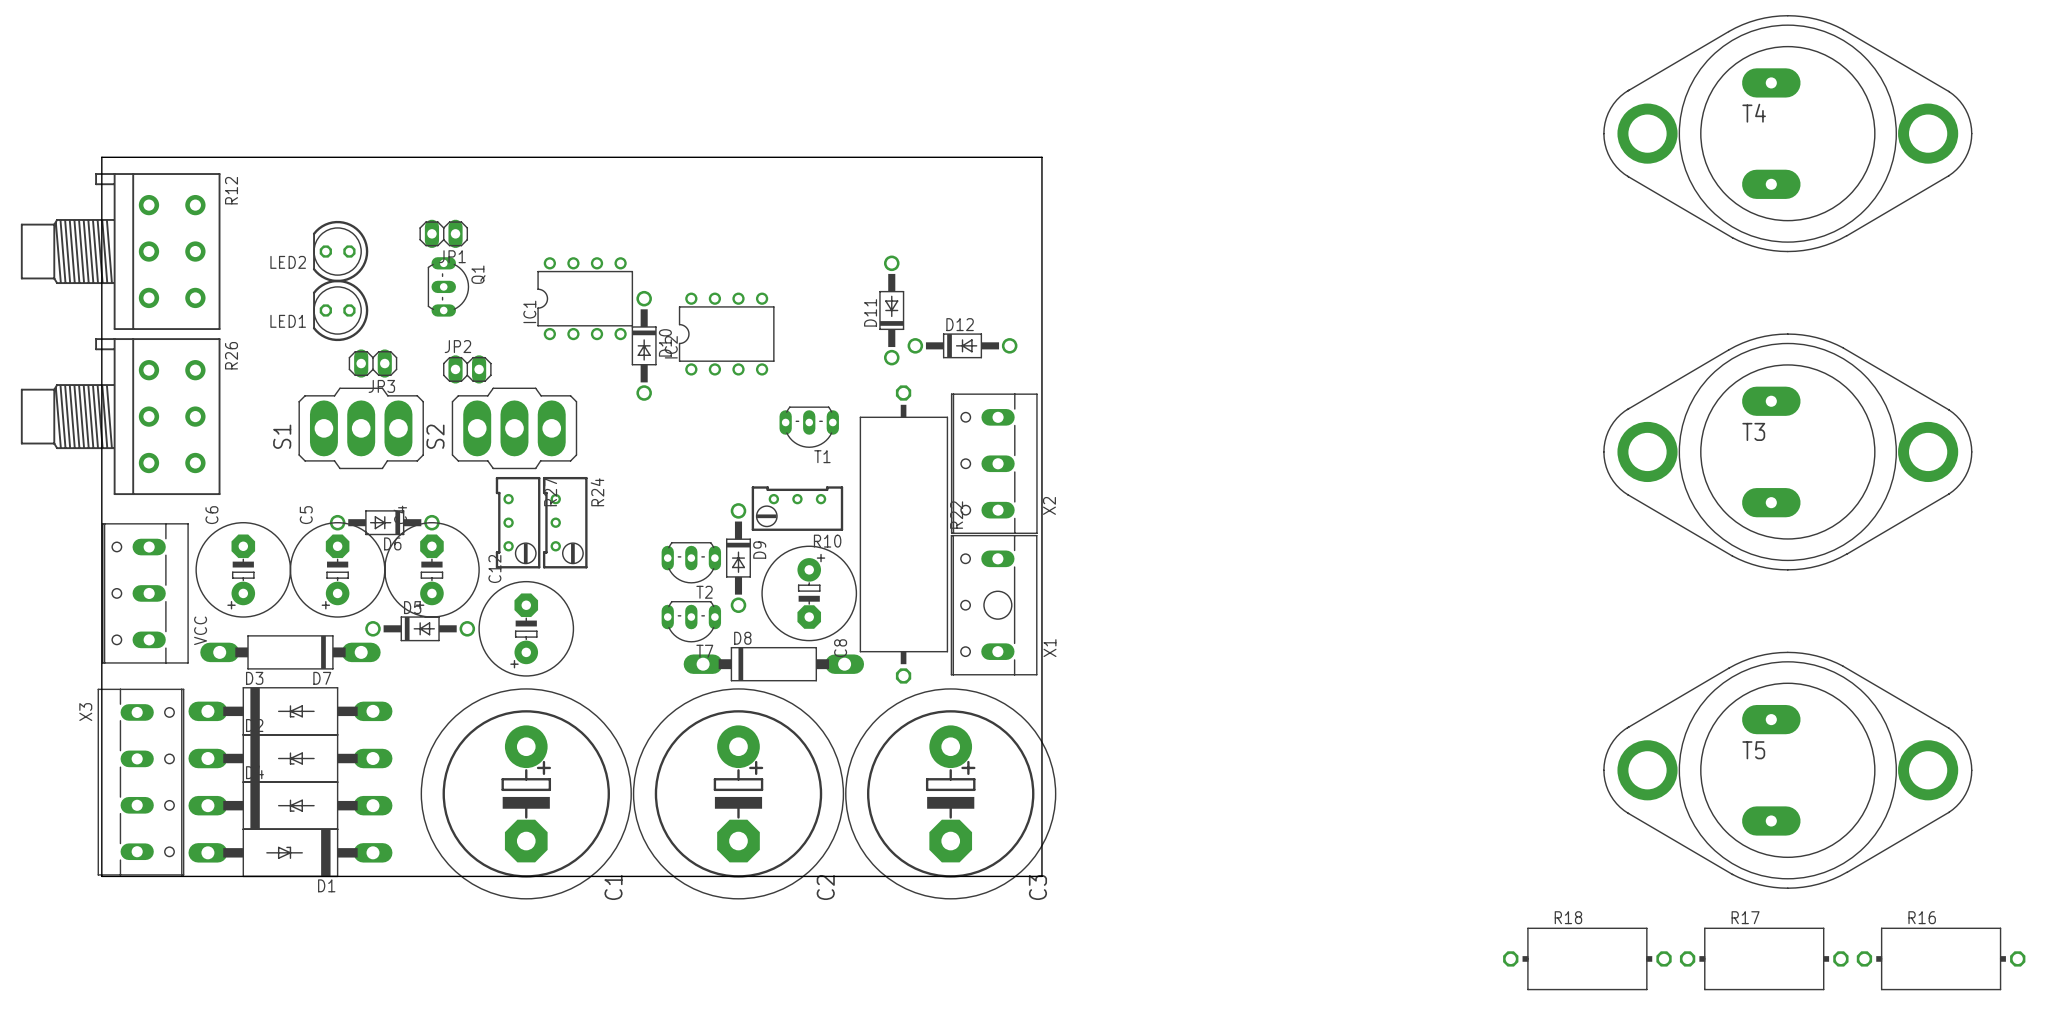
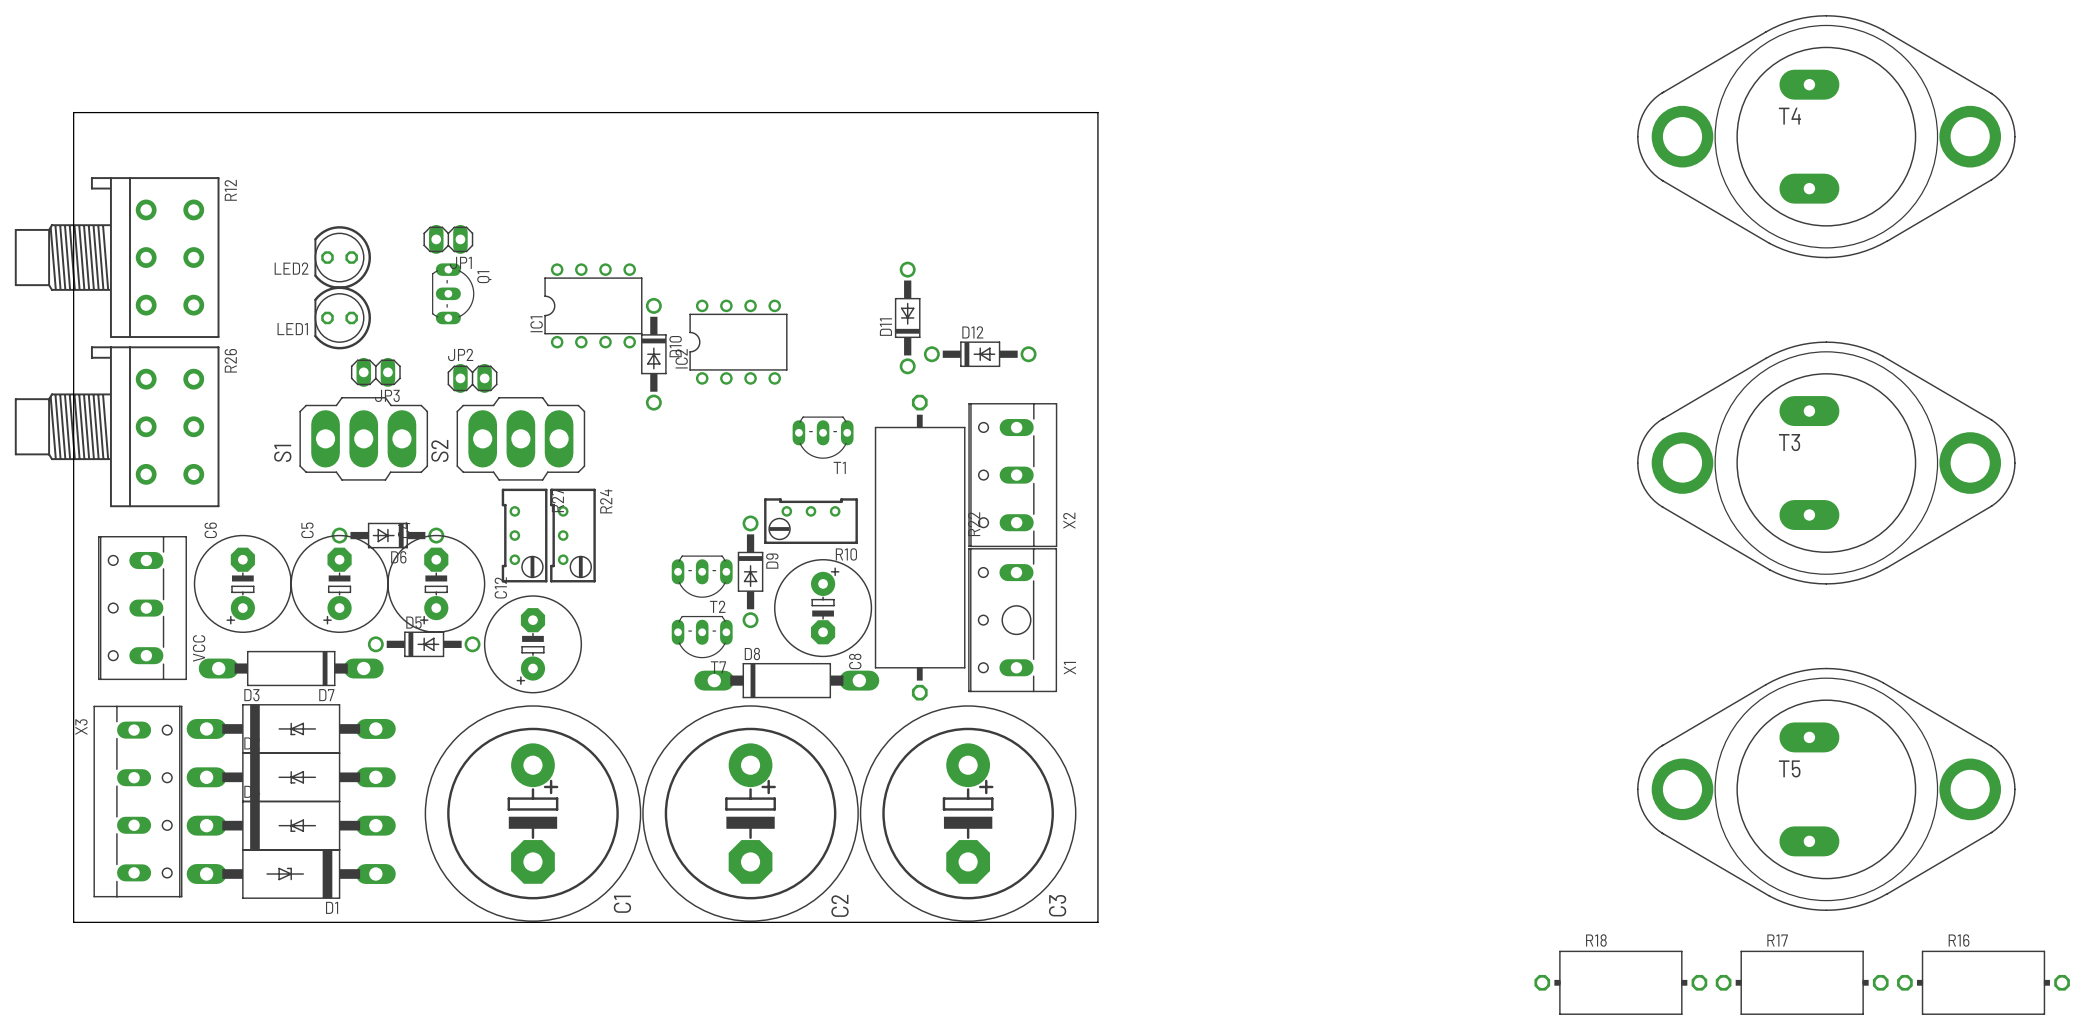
board edge: (101, 157) (1041, 157) (1041, 876) (101, 876) (101, 157) -> (73, 112) (73, 922) (1097, 922) (1097, 112) (73, 112)

